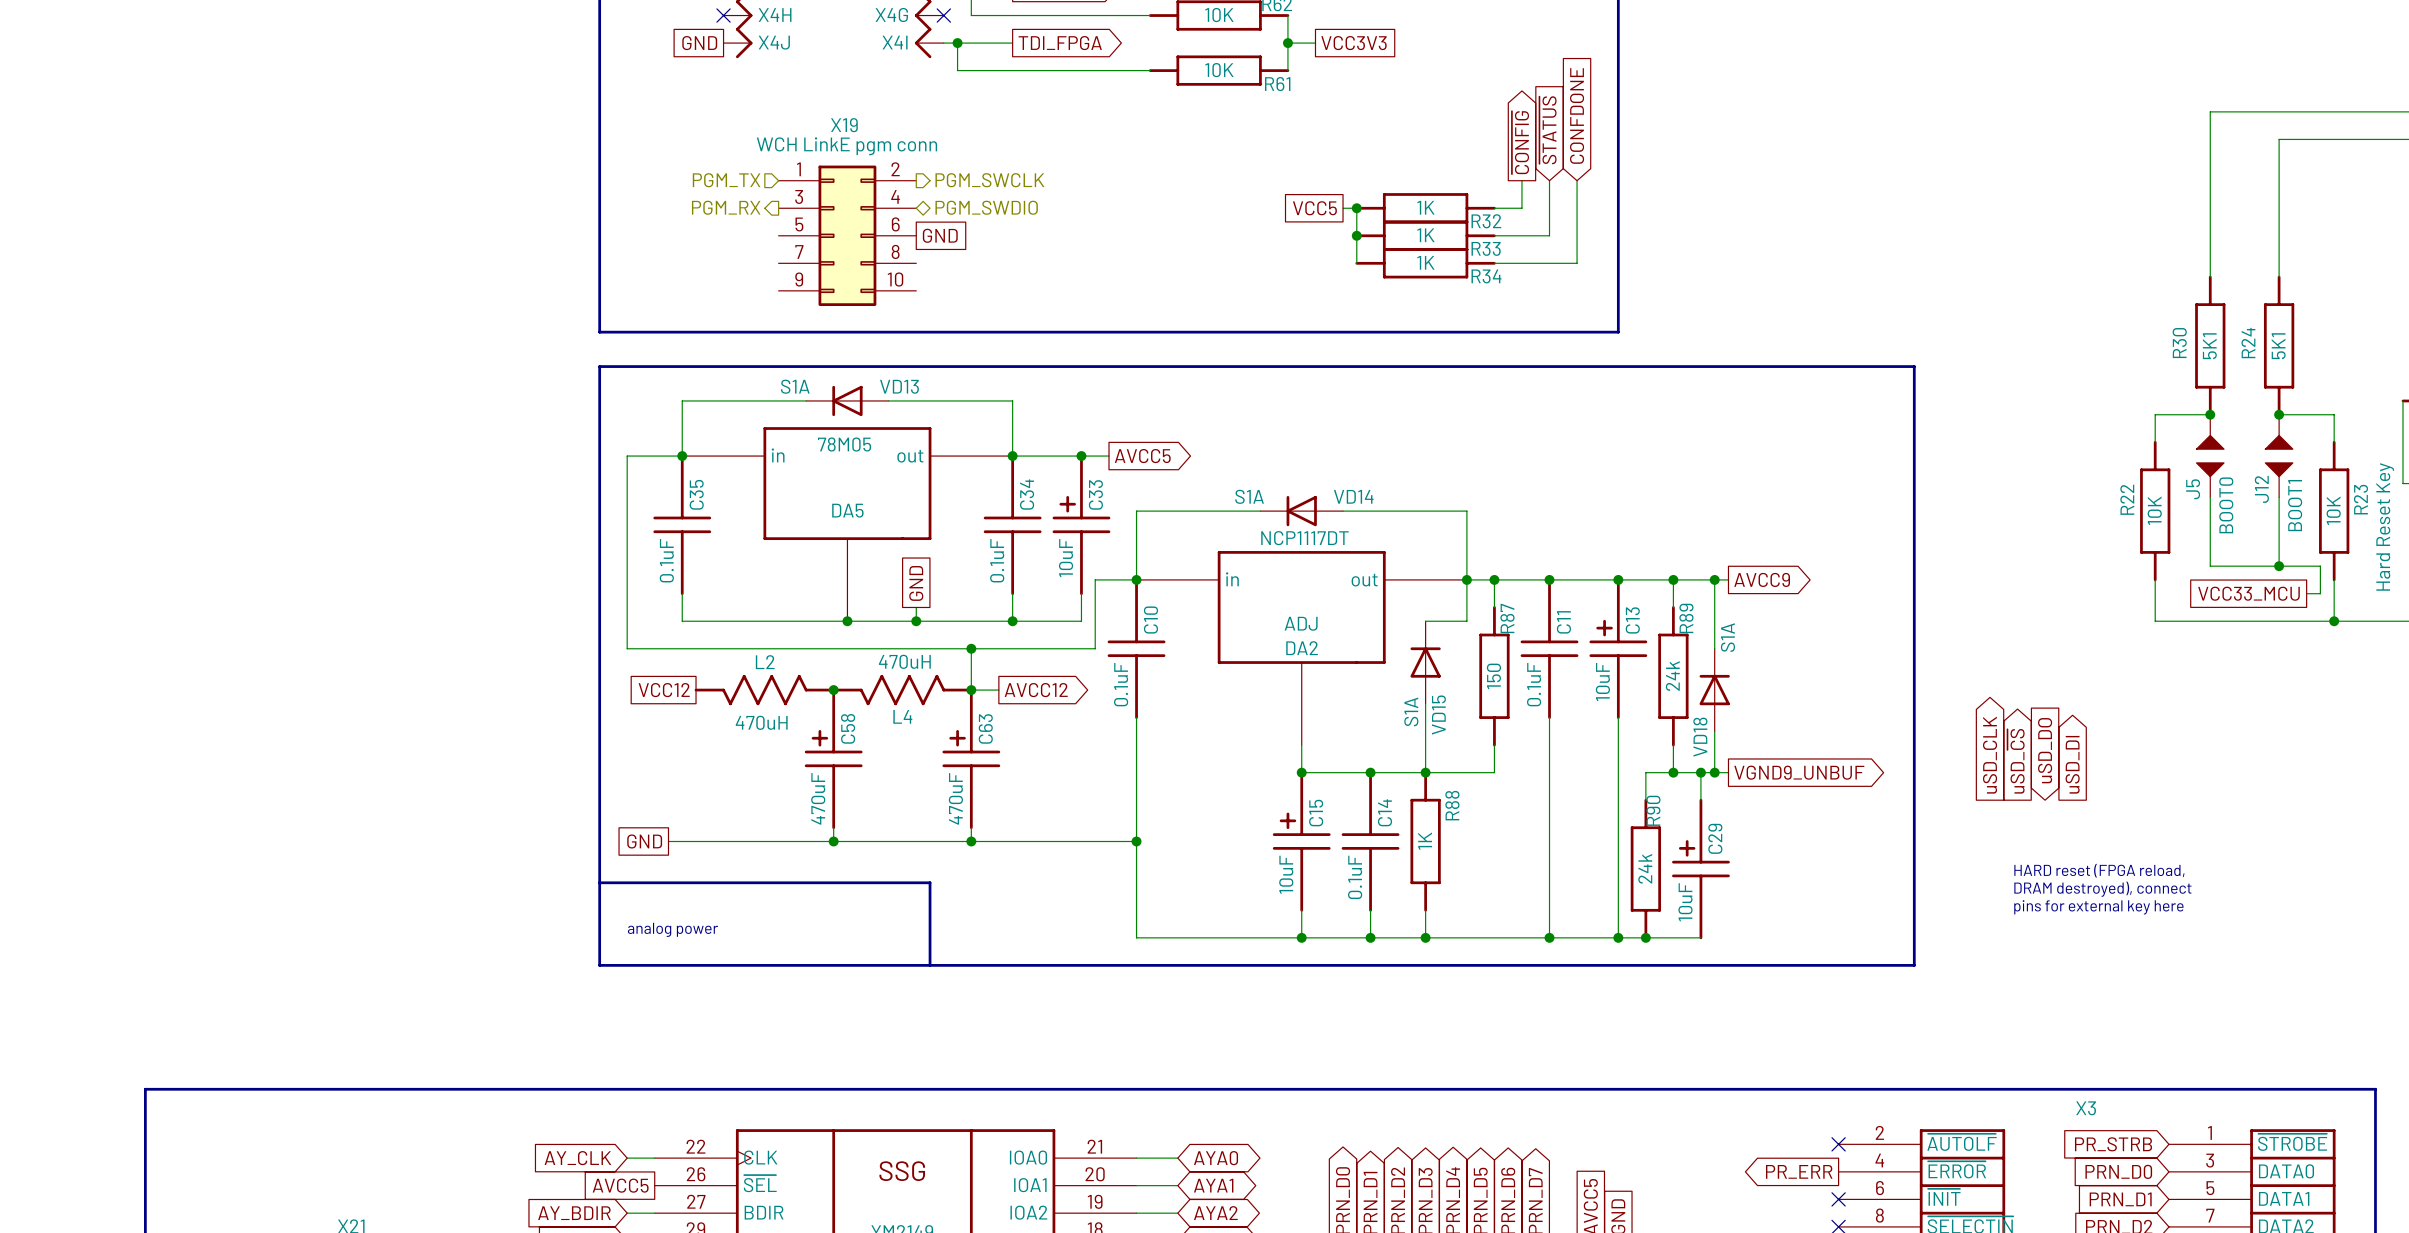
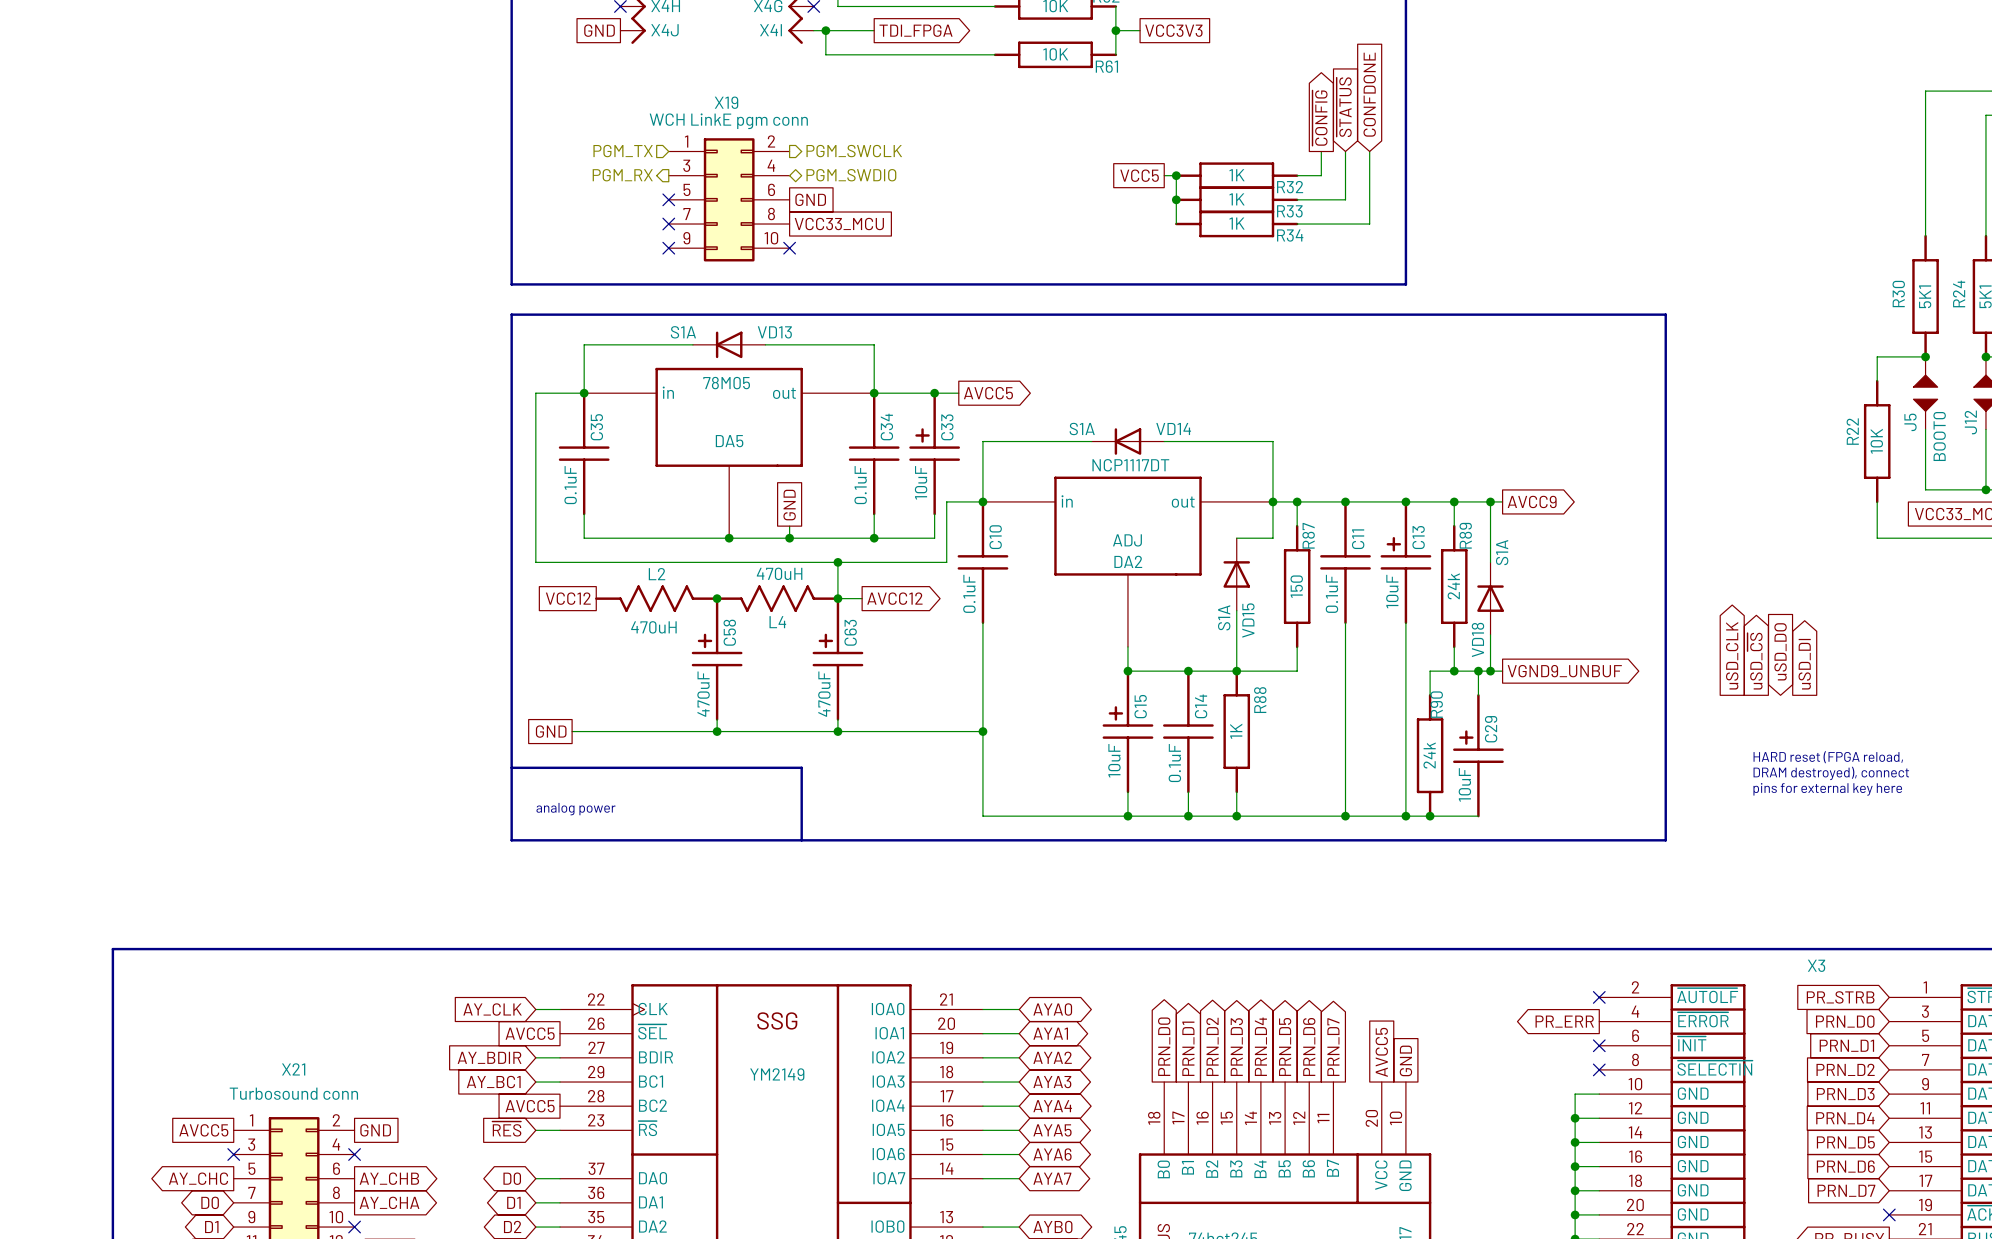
no-connect mark: none -> (668, 199)
no-connect mark: none -> (668, 224)
global label: none -> VCC33_MCU (839, 224)
no-connect mark: none -> (668, 248)
no-connect mark: none -> (789, 248)

